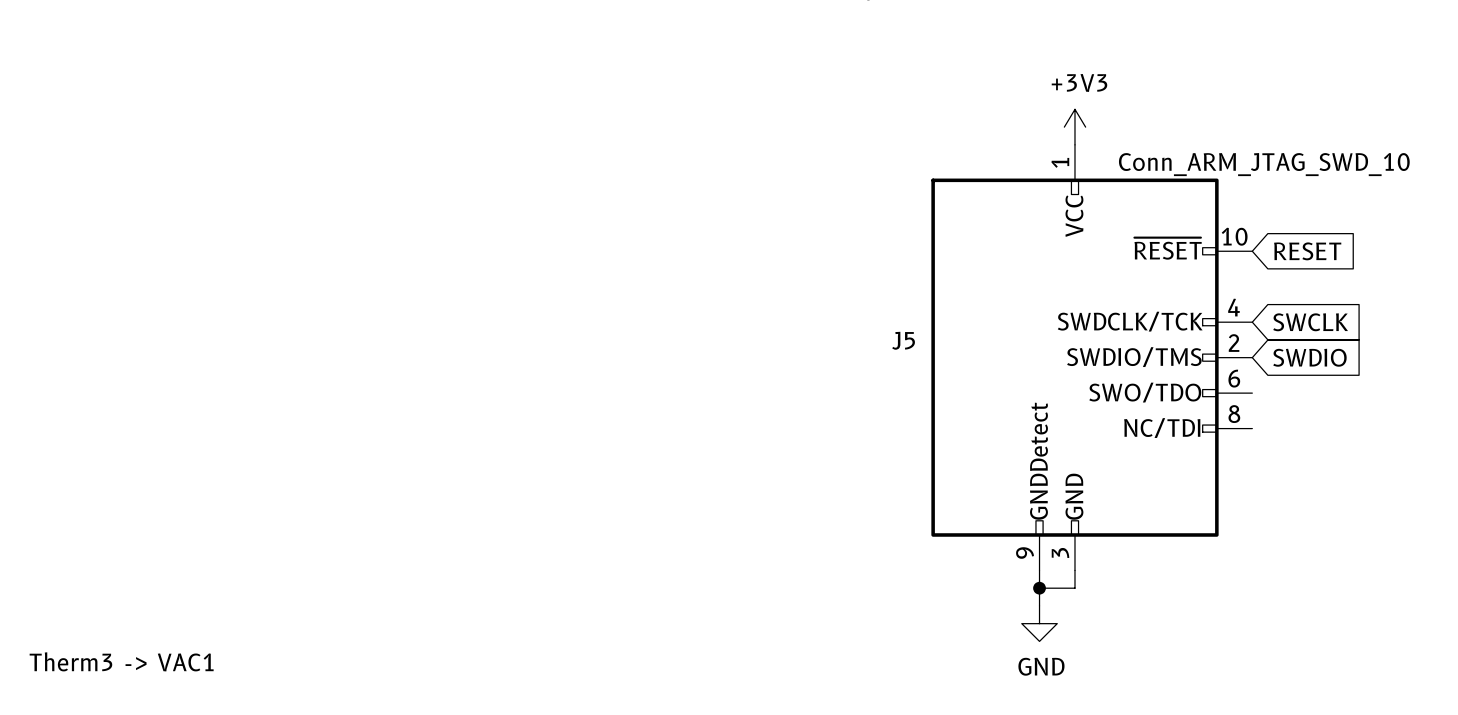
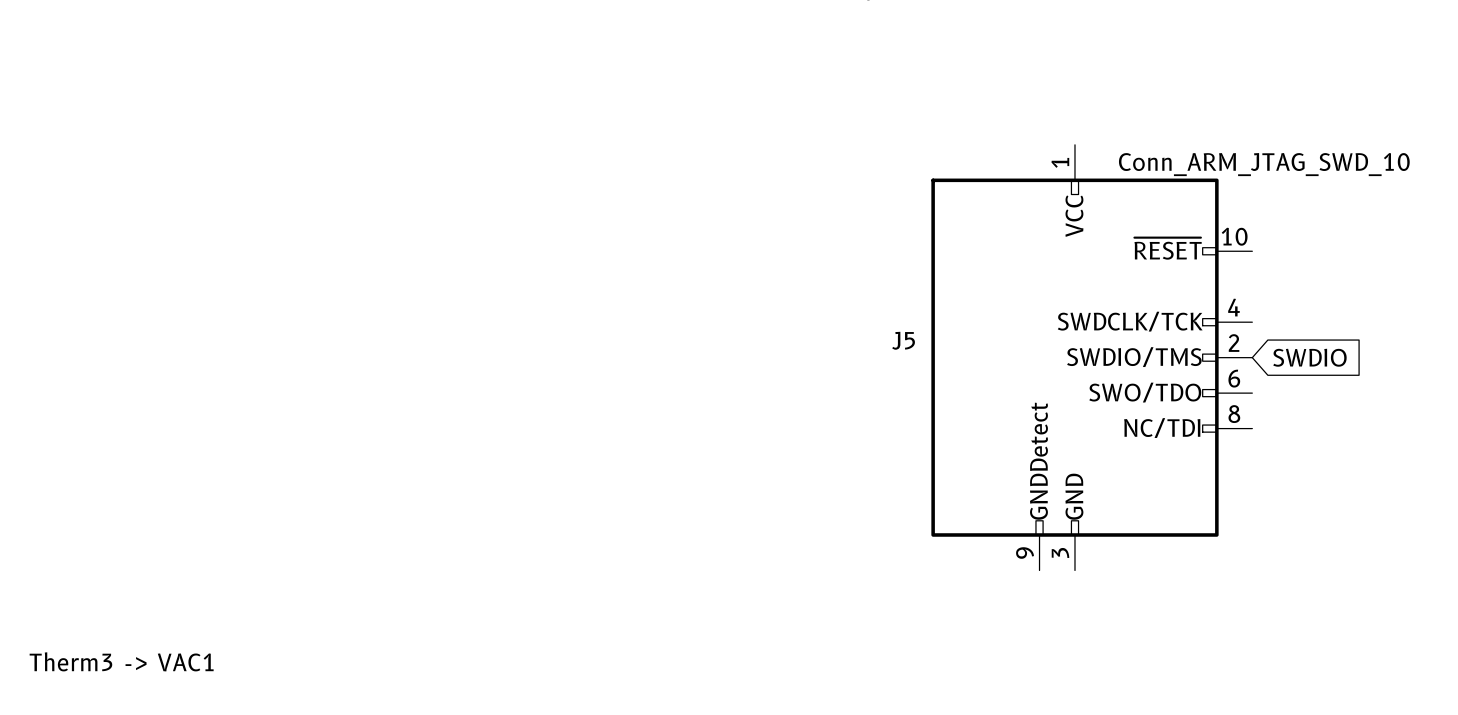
power symbol: +3V3 (1074, 127) -> none
global label: RESET (1307, 251) -> none
global label: SWCLK (1310, 322) -> none
wire: (1039, 570) (1039, 605) -> none
wire: (1074, 570) (1074, 588) (1039, 588) -> none
junction: (1039, 588) -> none
power symbol: GND (1039, 623) -> none

